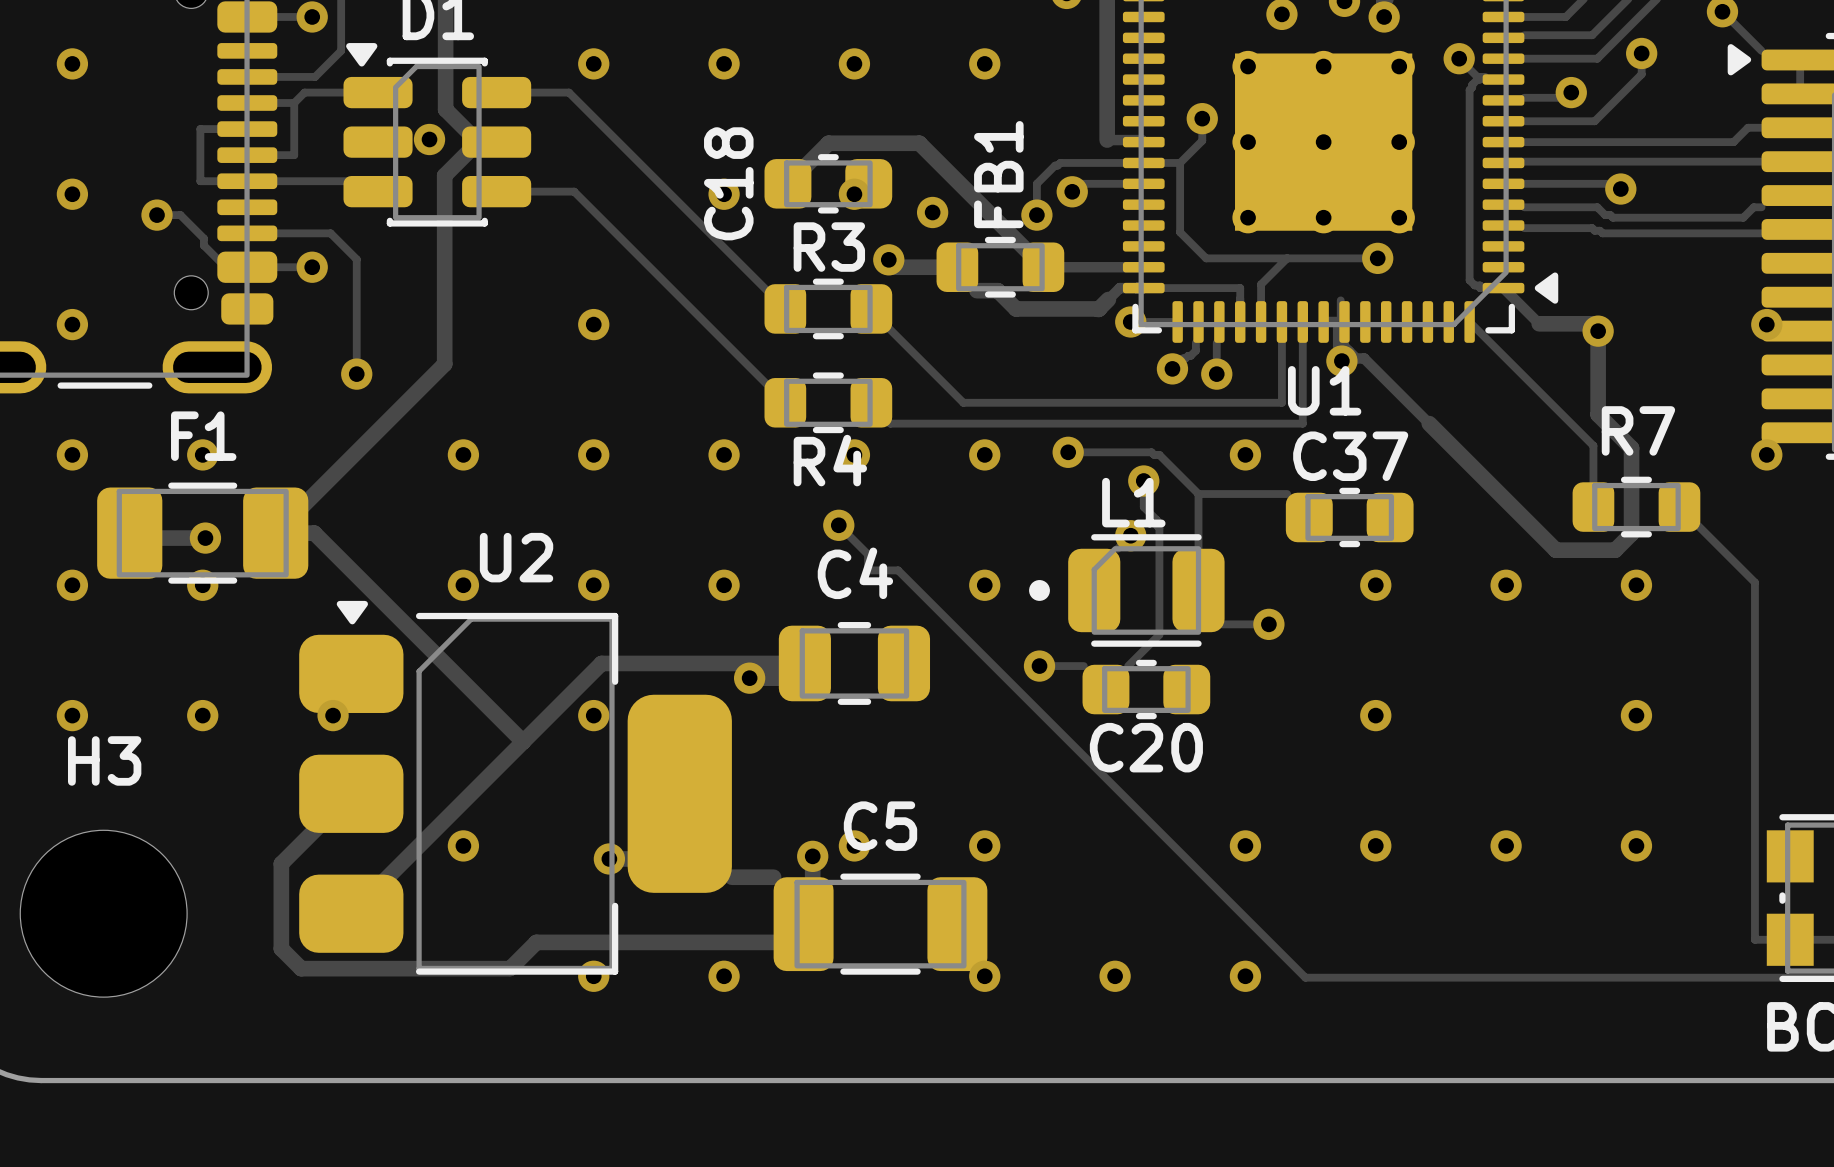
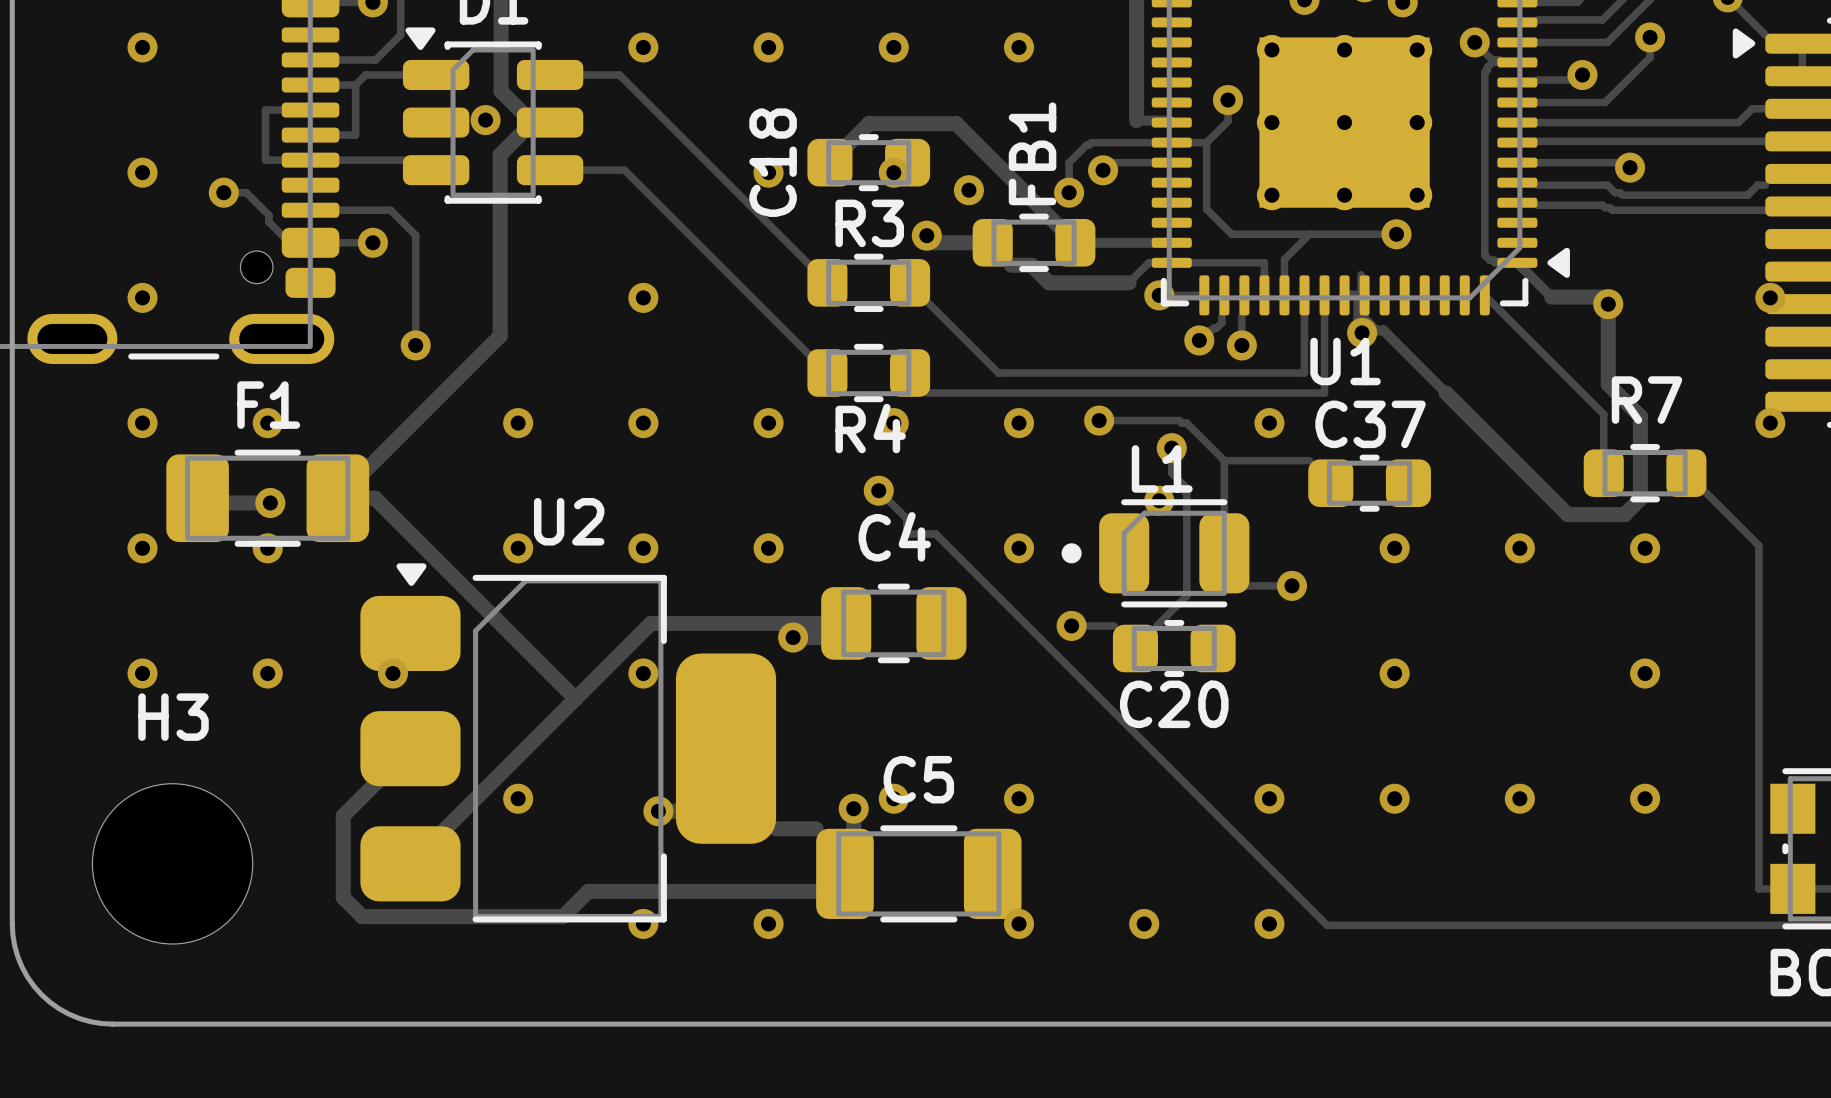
track width: thick (1136, 288) (1119, 288) (1098, 309) -> thin (1164, 262) (1148, 262) (1128, 283)

